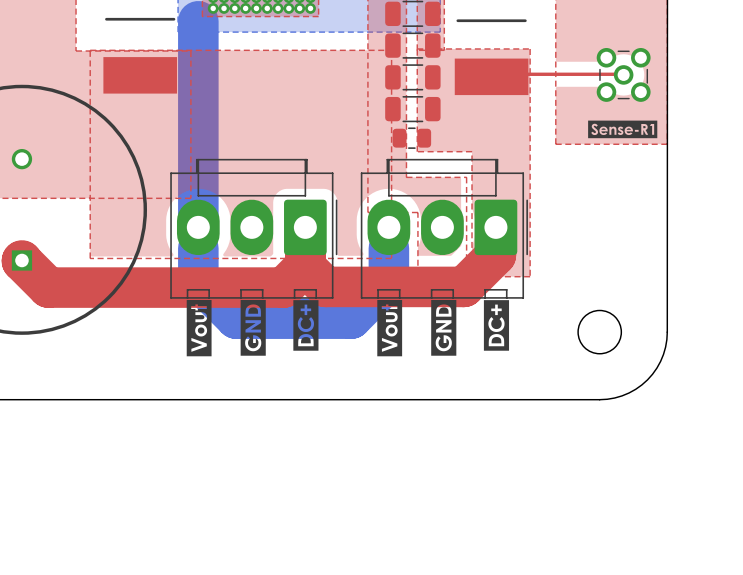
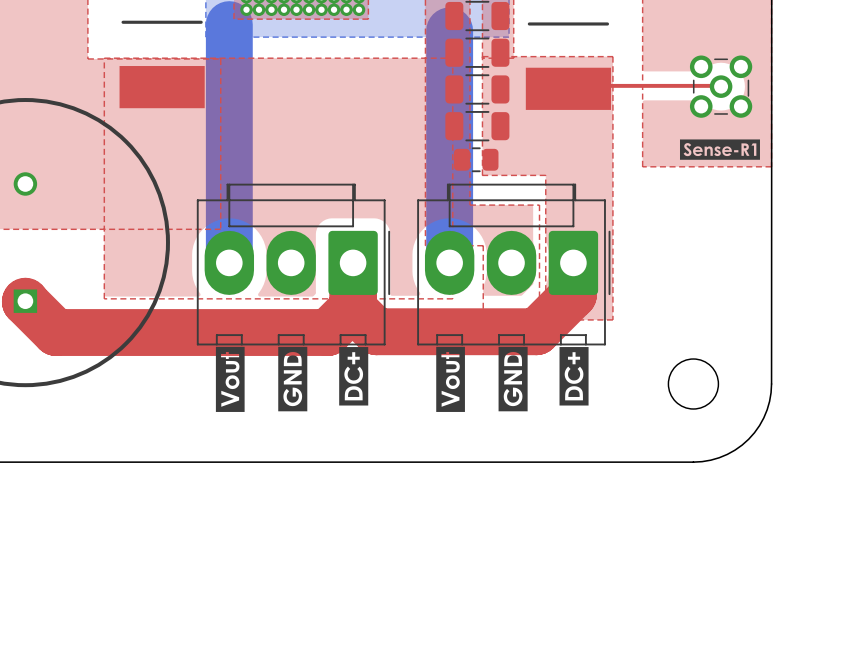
bottom track: none -> (449, 30) (449, 262)
bottom track: (198, 248) (198, 280) (236, 318) (351, 318) (388, 280) (388, 248) -> none

